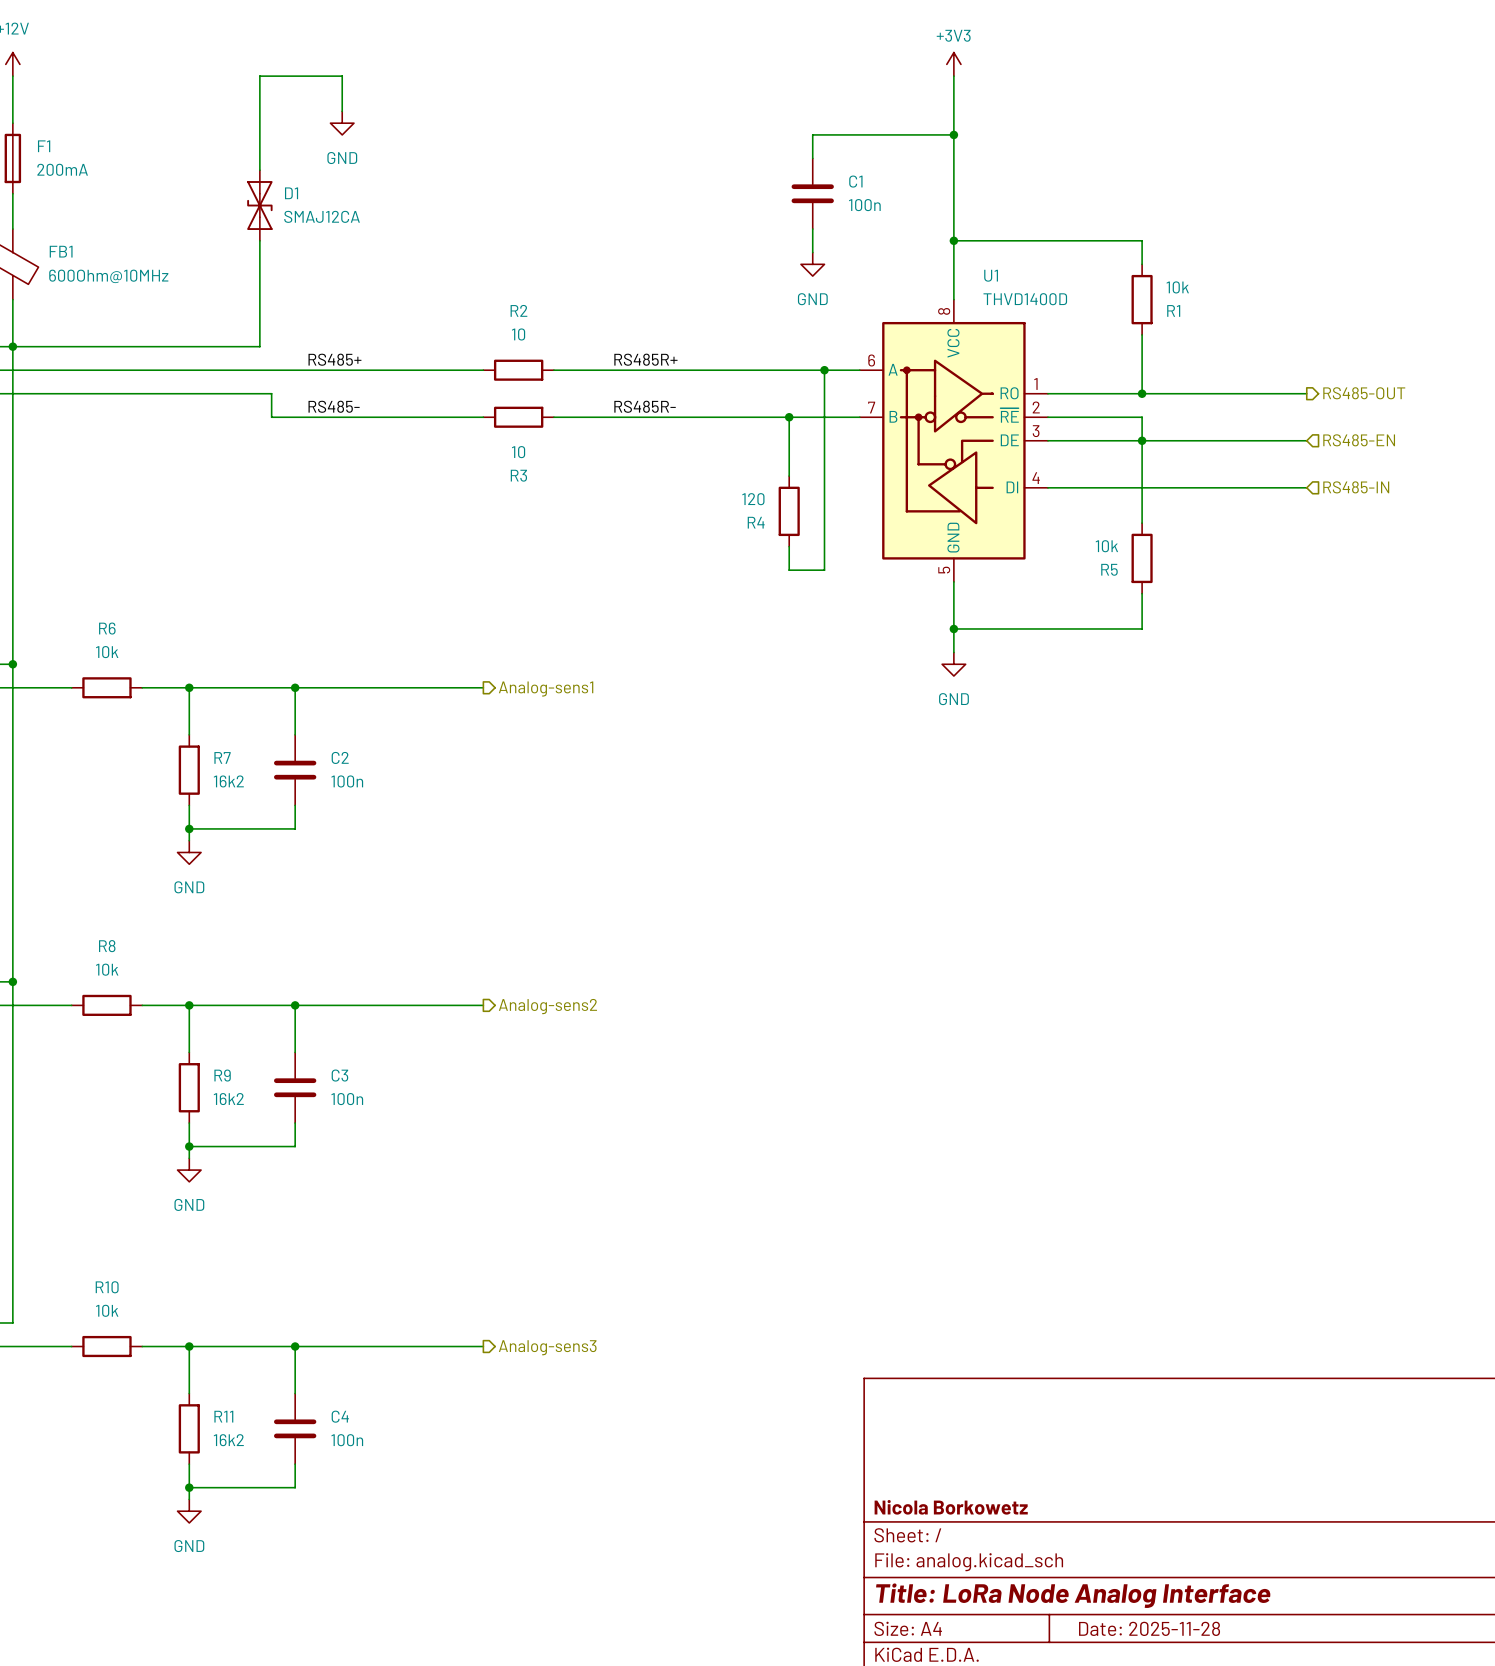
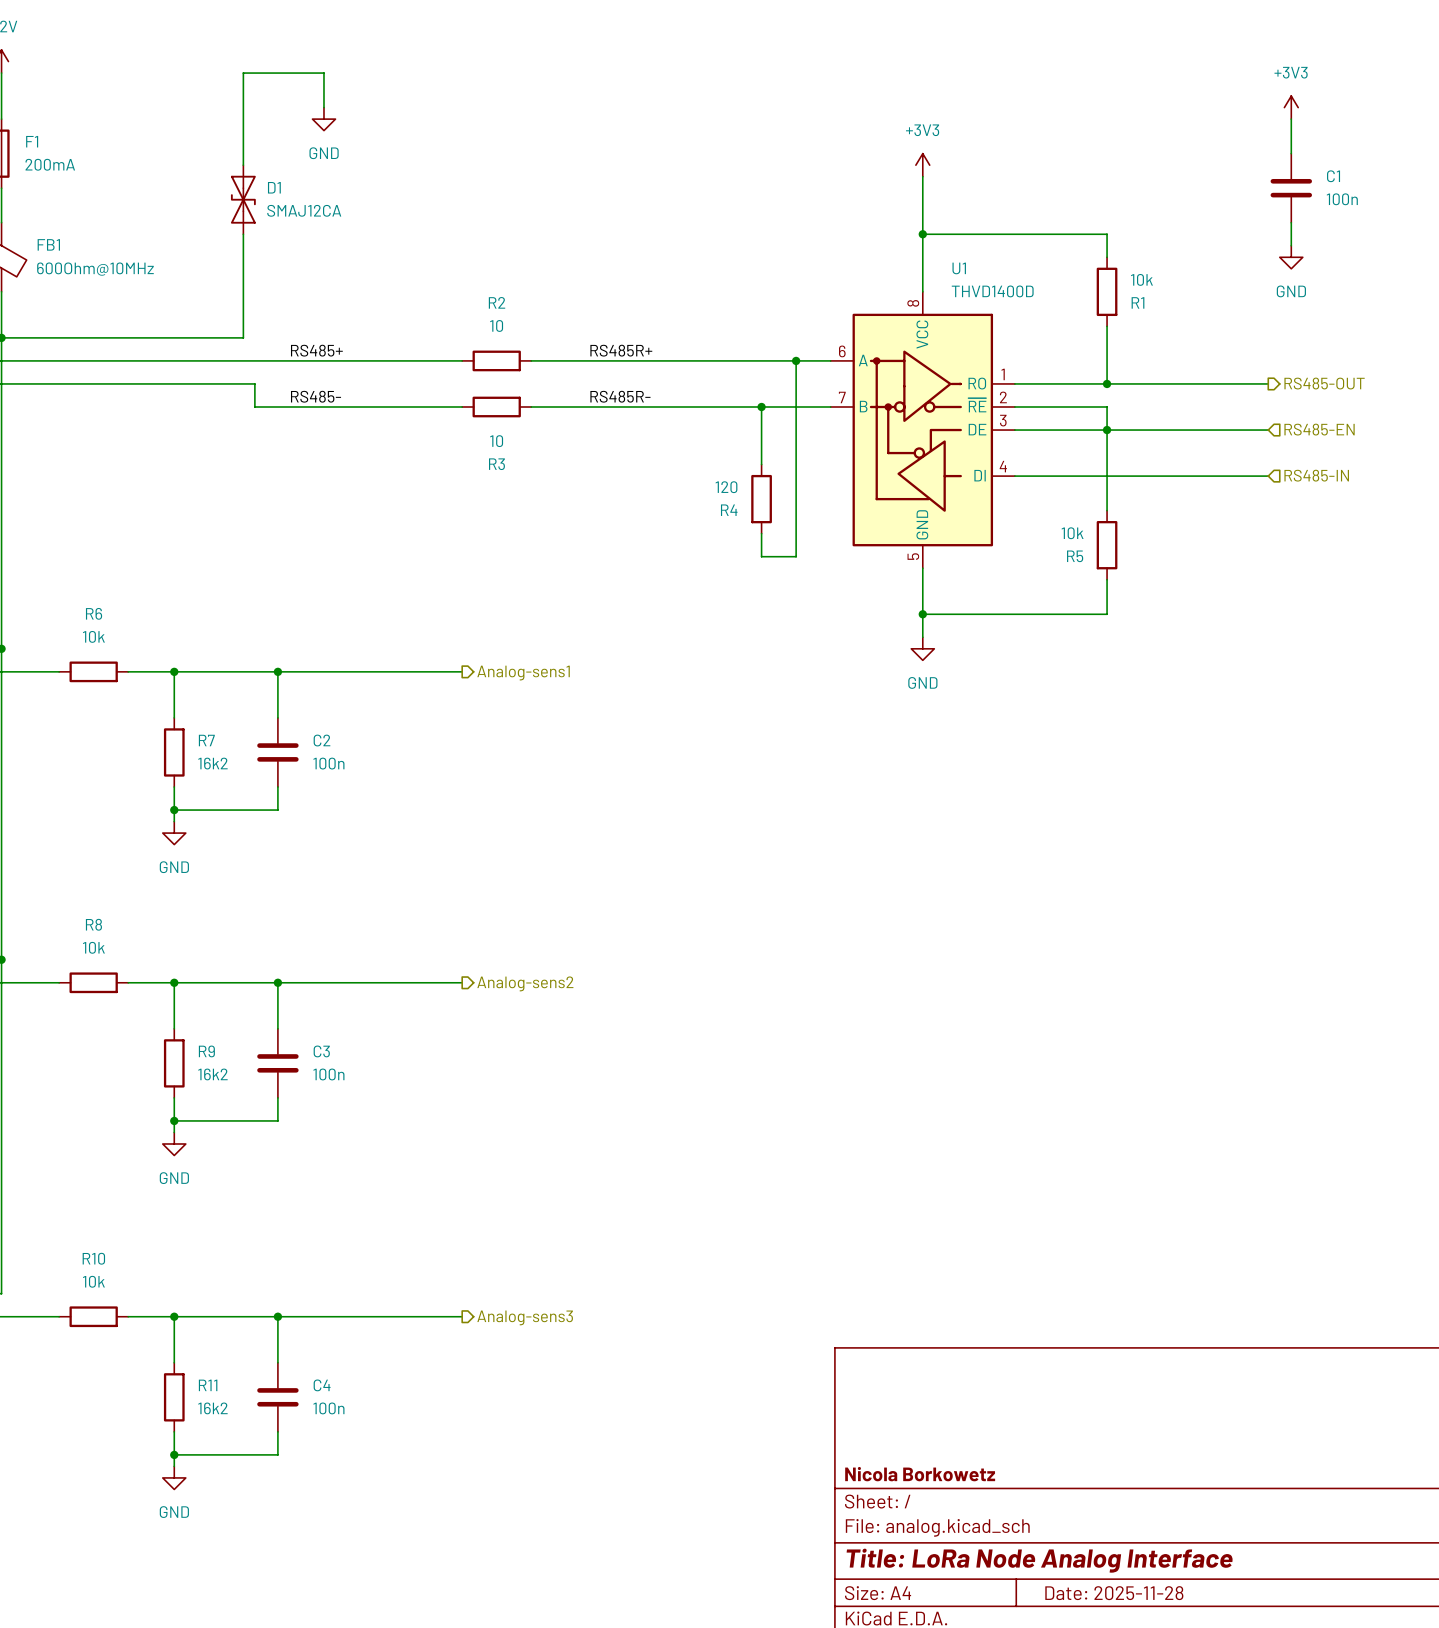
power symbol text position: +3V3 (953, 35) -> +3V3 (922, 130)
power symbol position: +3V3 (953, 64) -> +3V3 (922, 165)
wire: (953, 76) (953, 181) -> none
power symbol: none -> +3V3 (1291, 107)
wire: none -> (1291, 119) (1291, 153)
wire: (953, 134) (812, 134) (812, 158) -> none
junction: (953, 134) -> none
C1 position: (812, 193) -> (1291, 188)
wire: (812, 229) (812, 252) -> none
wire: none -> (1291, 222) (1291, 245)
power symbol: GND (812, 264) -> none
power symbol: none -> GND (1291, 257)

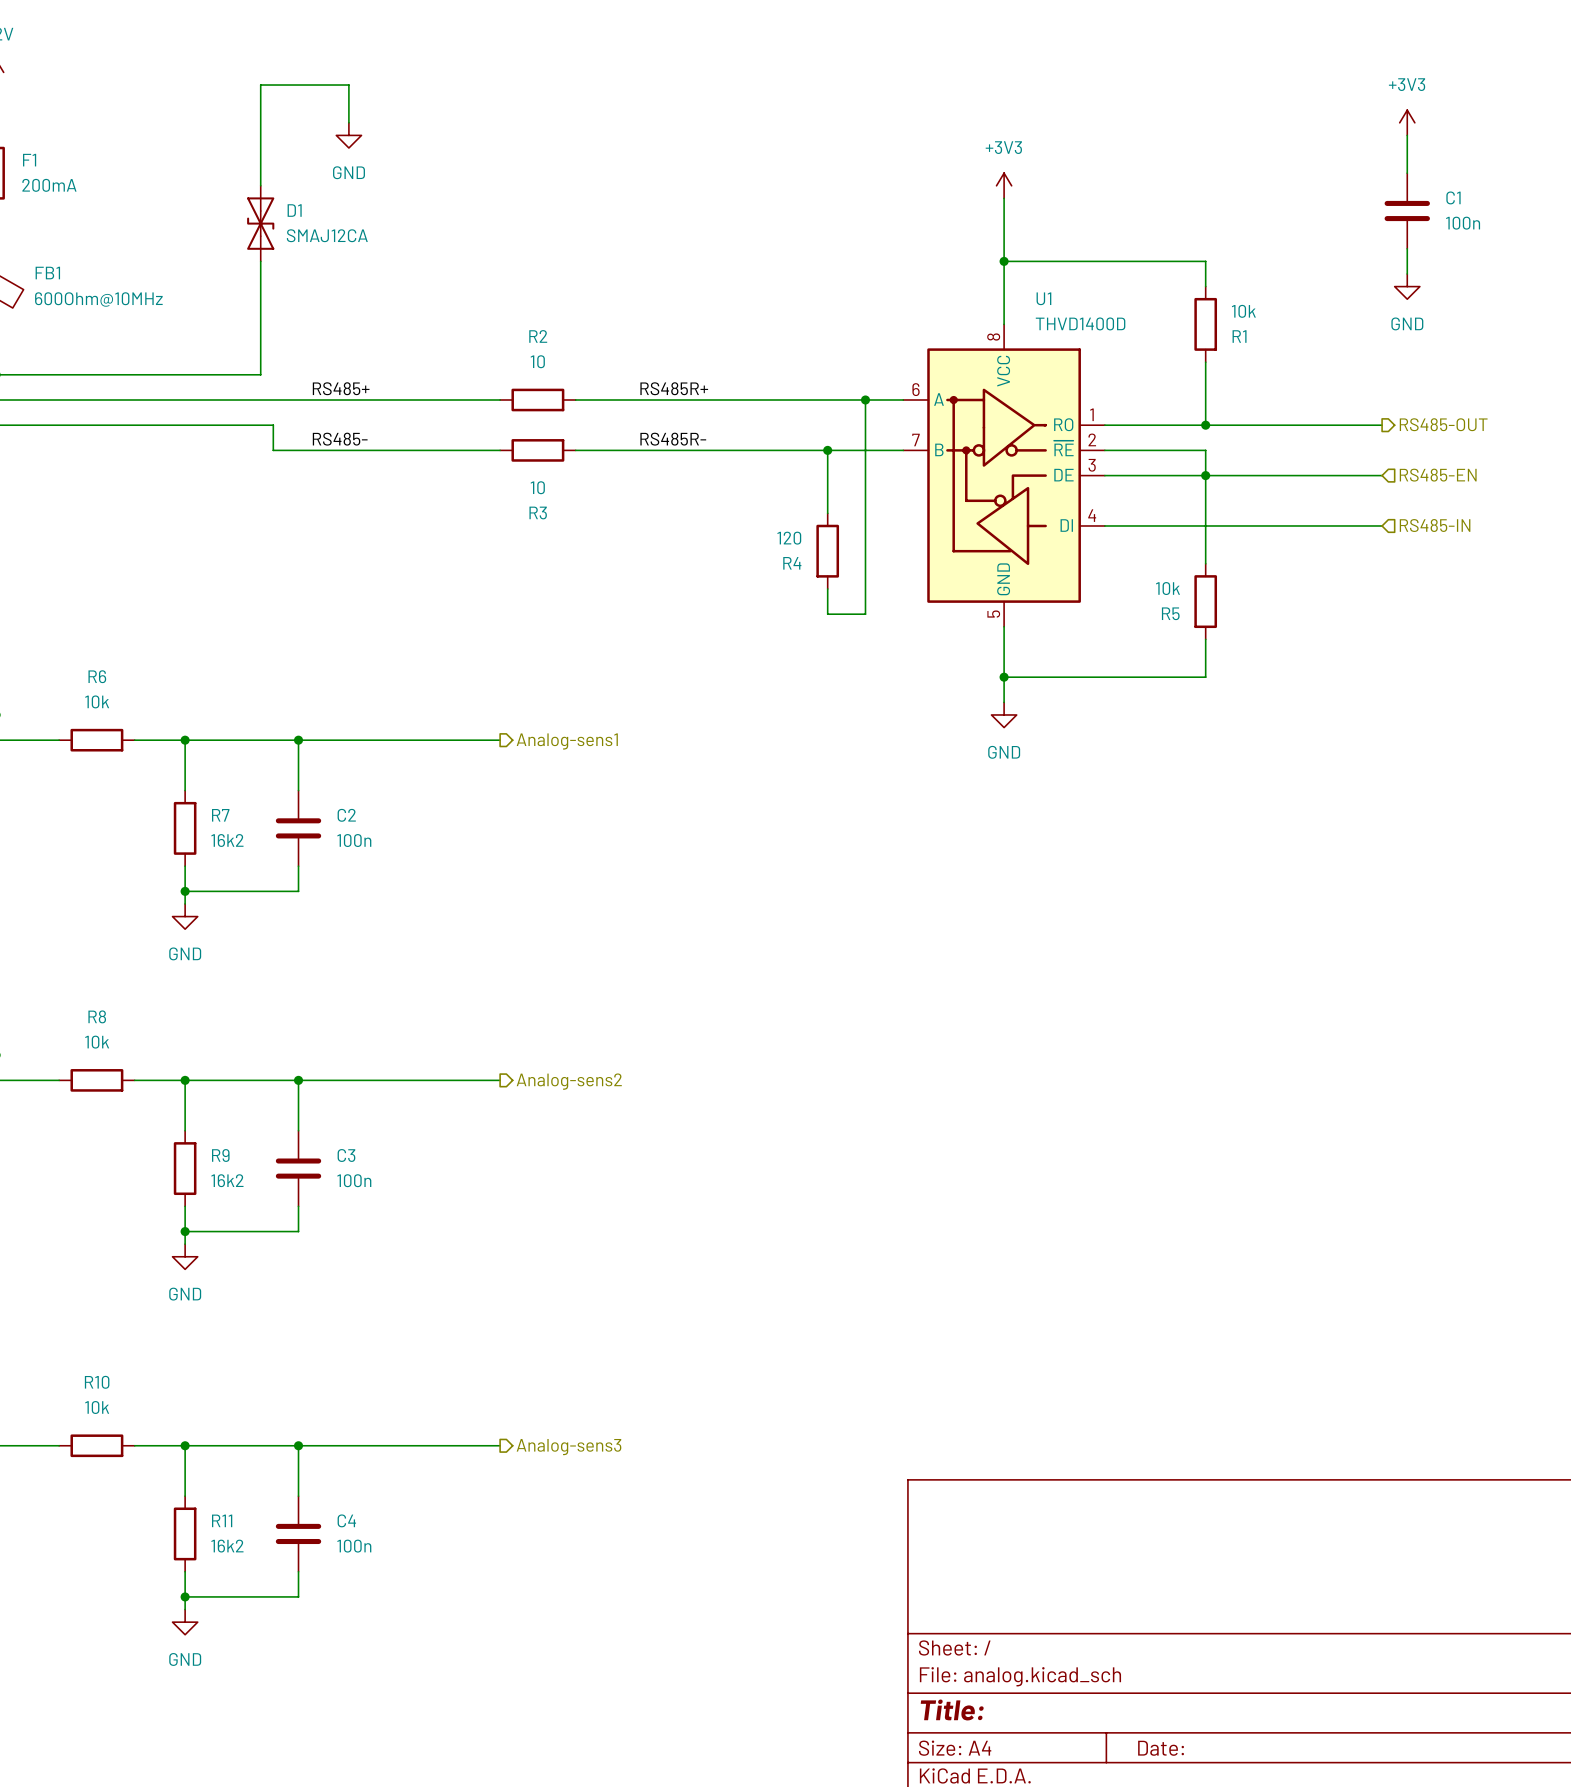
title block: Nicola Borkowetz (920, 1474) -> none
title block: Title: LoRa Node Analog Interface (1039, 1560) -> Title: (952, 1709)
title block: Date: 2025-11-28 (1114, 1593) -> Date: (1161, 1748)

